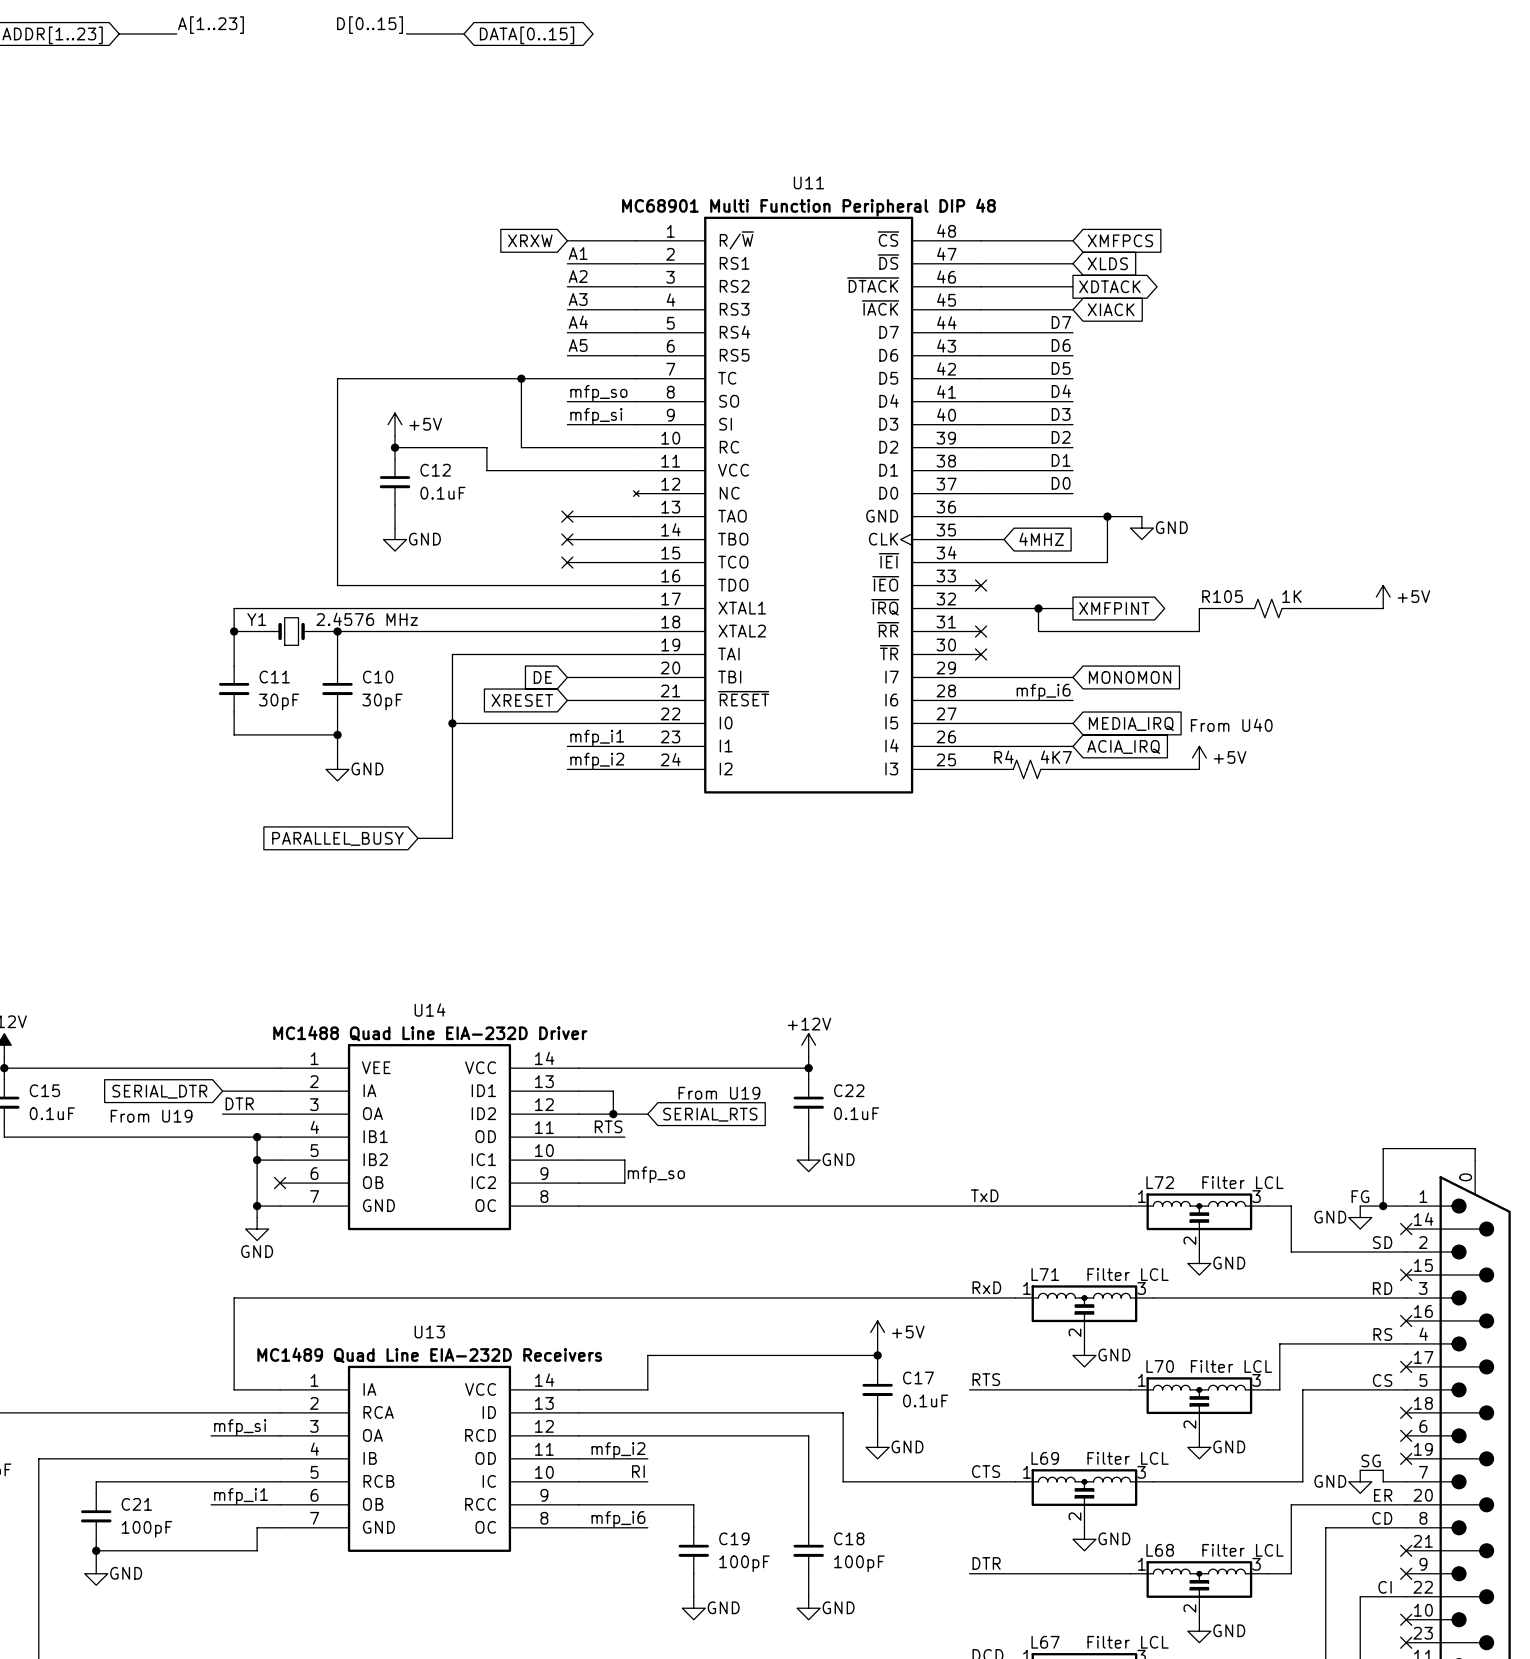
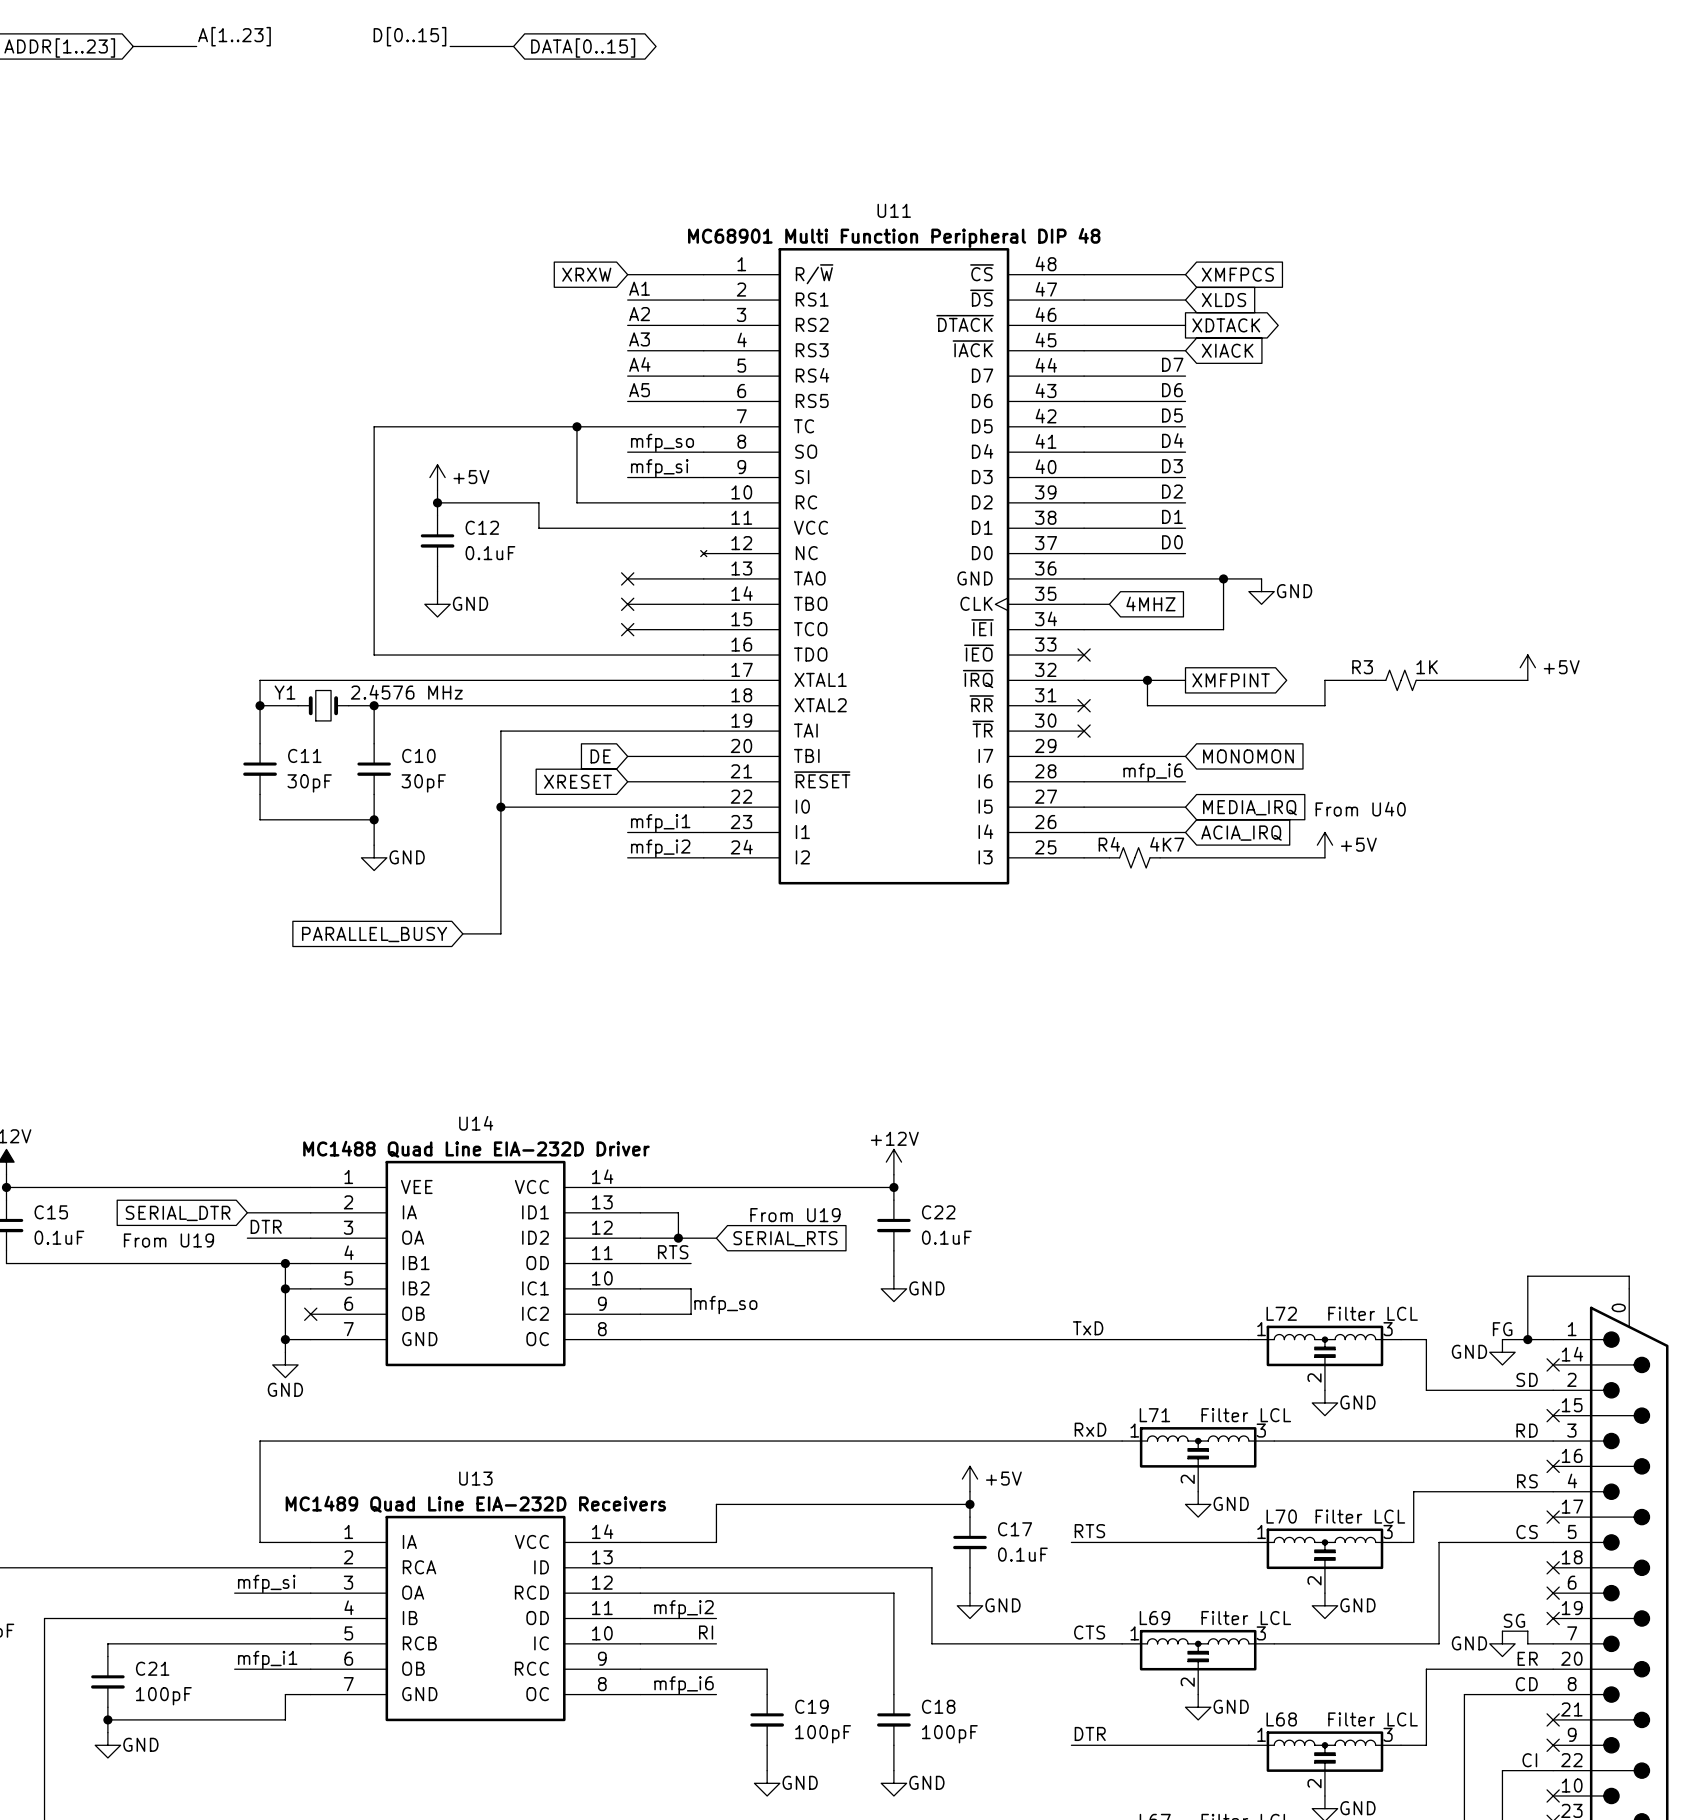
R105 name: R105 (1222, 596) -> R3 (1362, 667)

